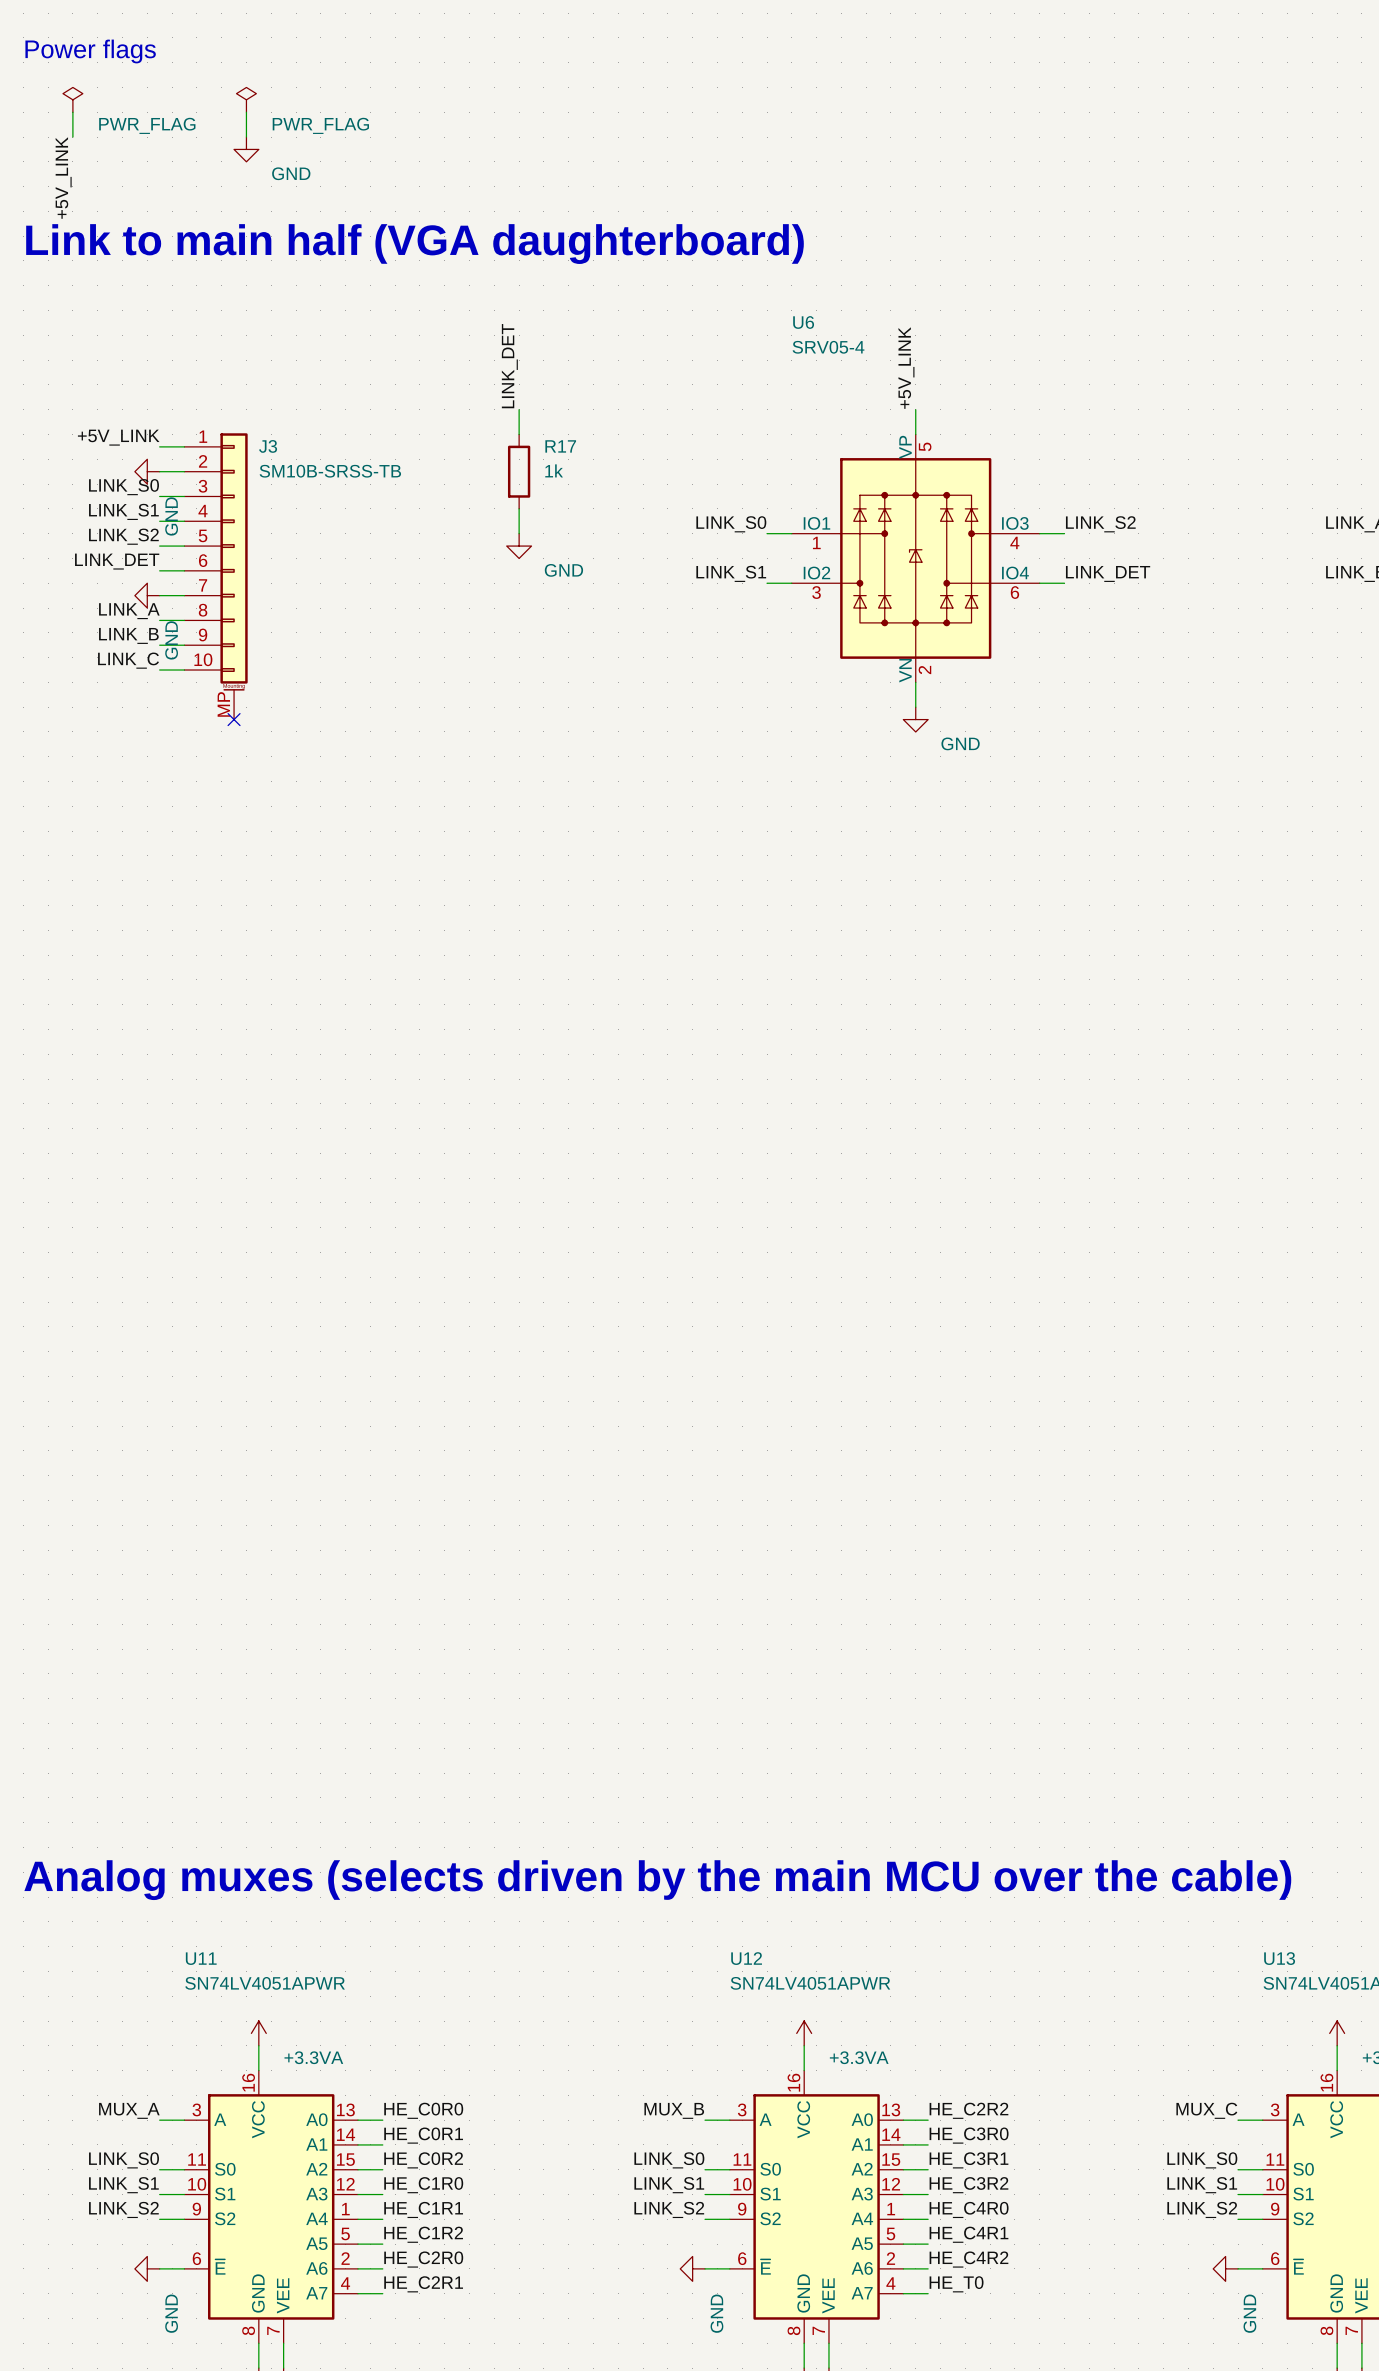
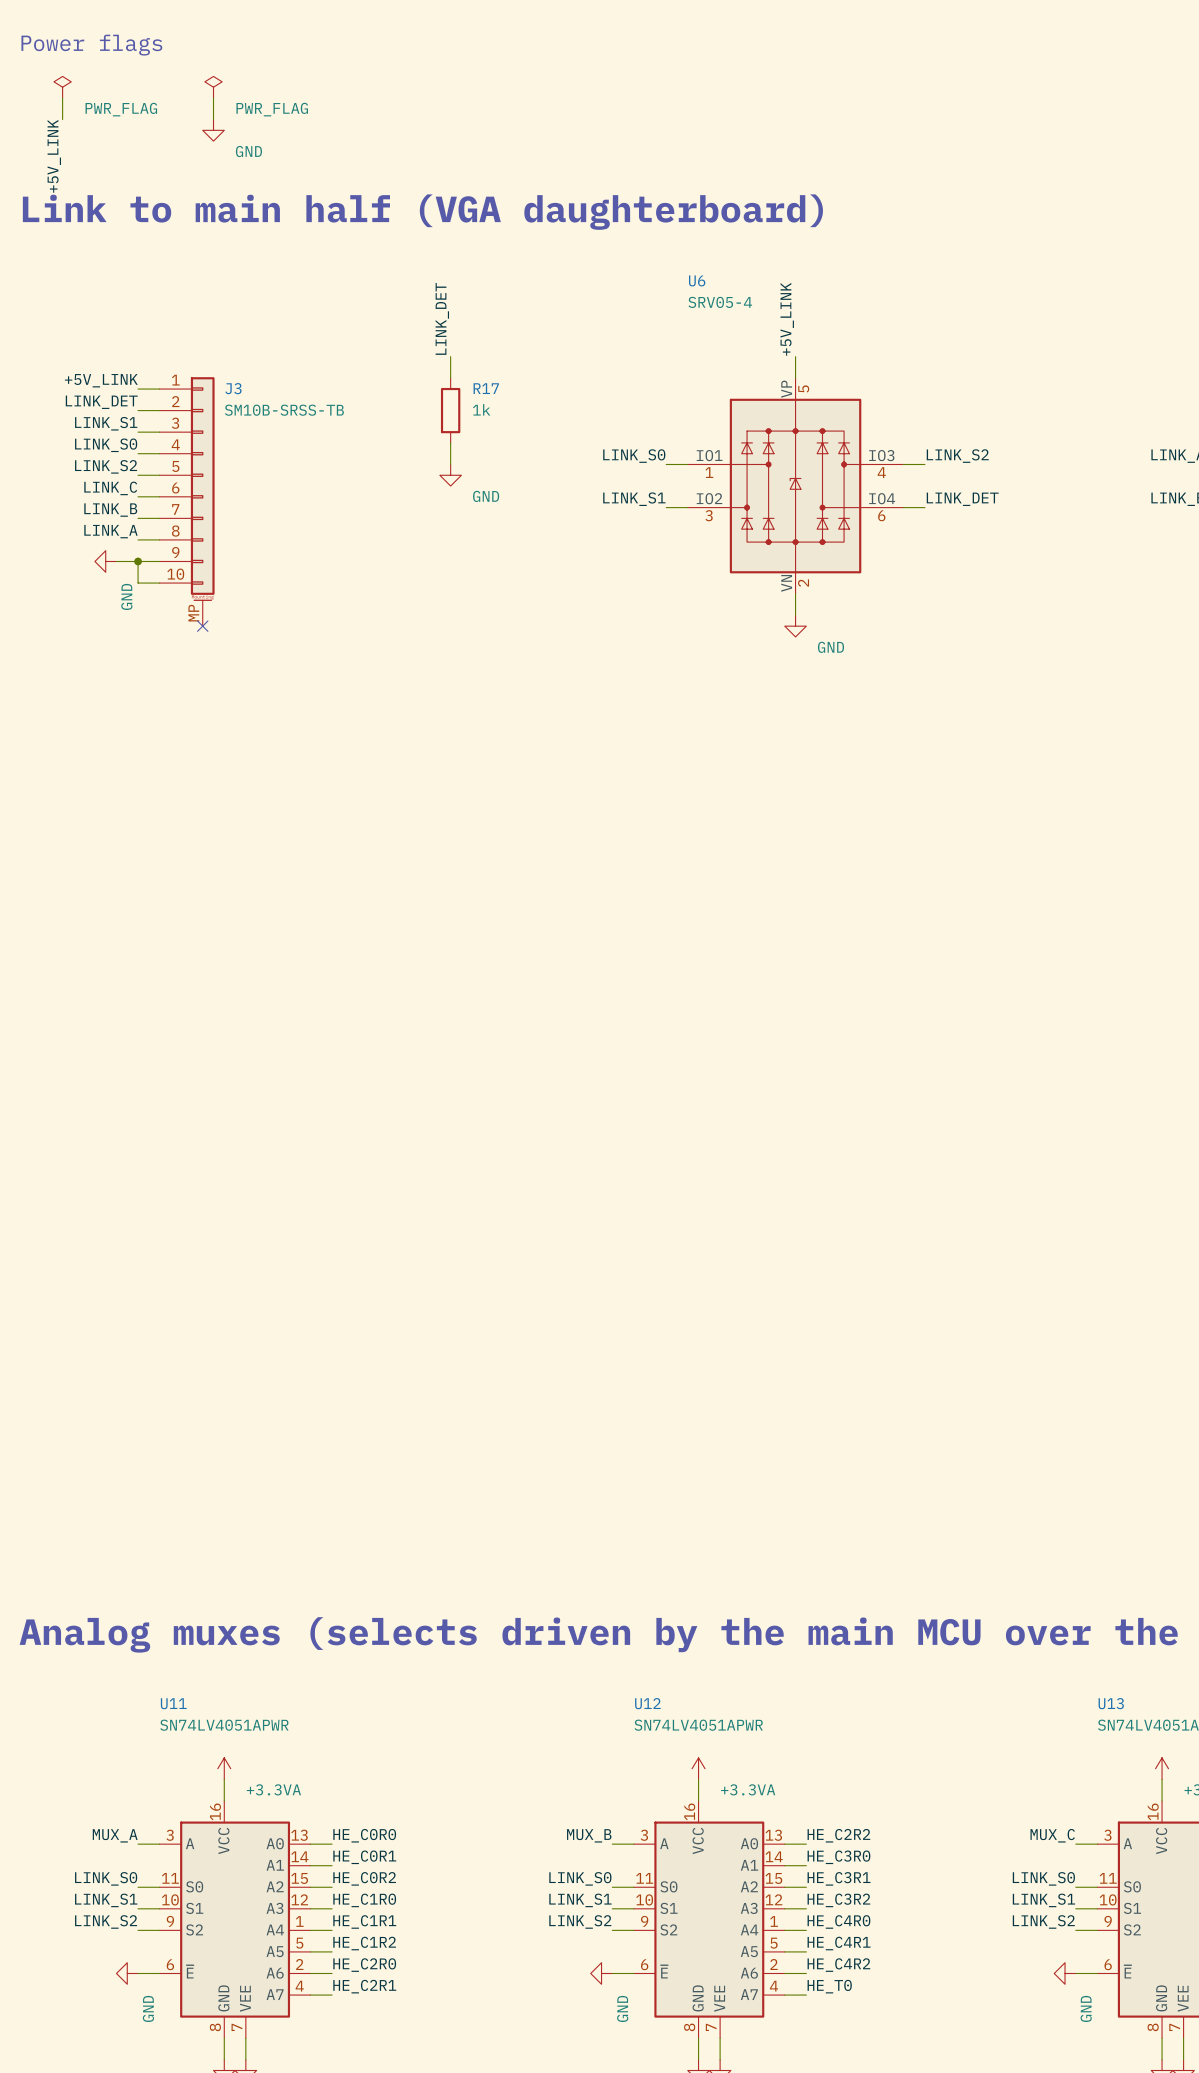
label: none -> LINK_DET (101, 402)
power symbol: GND (147, 471) -> none
label: LINK_S0 (124, 487) -> LINK_S1 (106, 423)
label: LINK_S1 (123, 511) -> LINK_S0 (106, 445)
label: LINK_DET (117, 561) -> LINK_C (110, 488)
power symbol position: GND (147, 595) -> GND (105, 561)
label position: LINK_B (128, 635) -> LINK_B (110, 510)
wire: none -> (116, 561) (138, 561) (138, 583)
junction: none -> (138, 561)
label: LINK_C (128, 660) -> none

